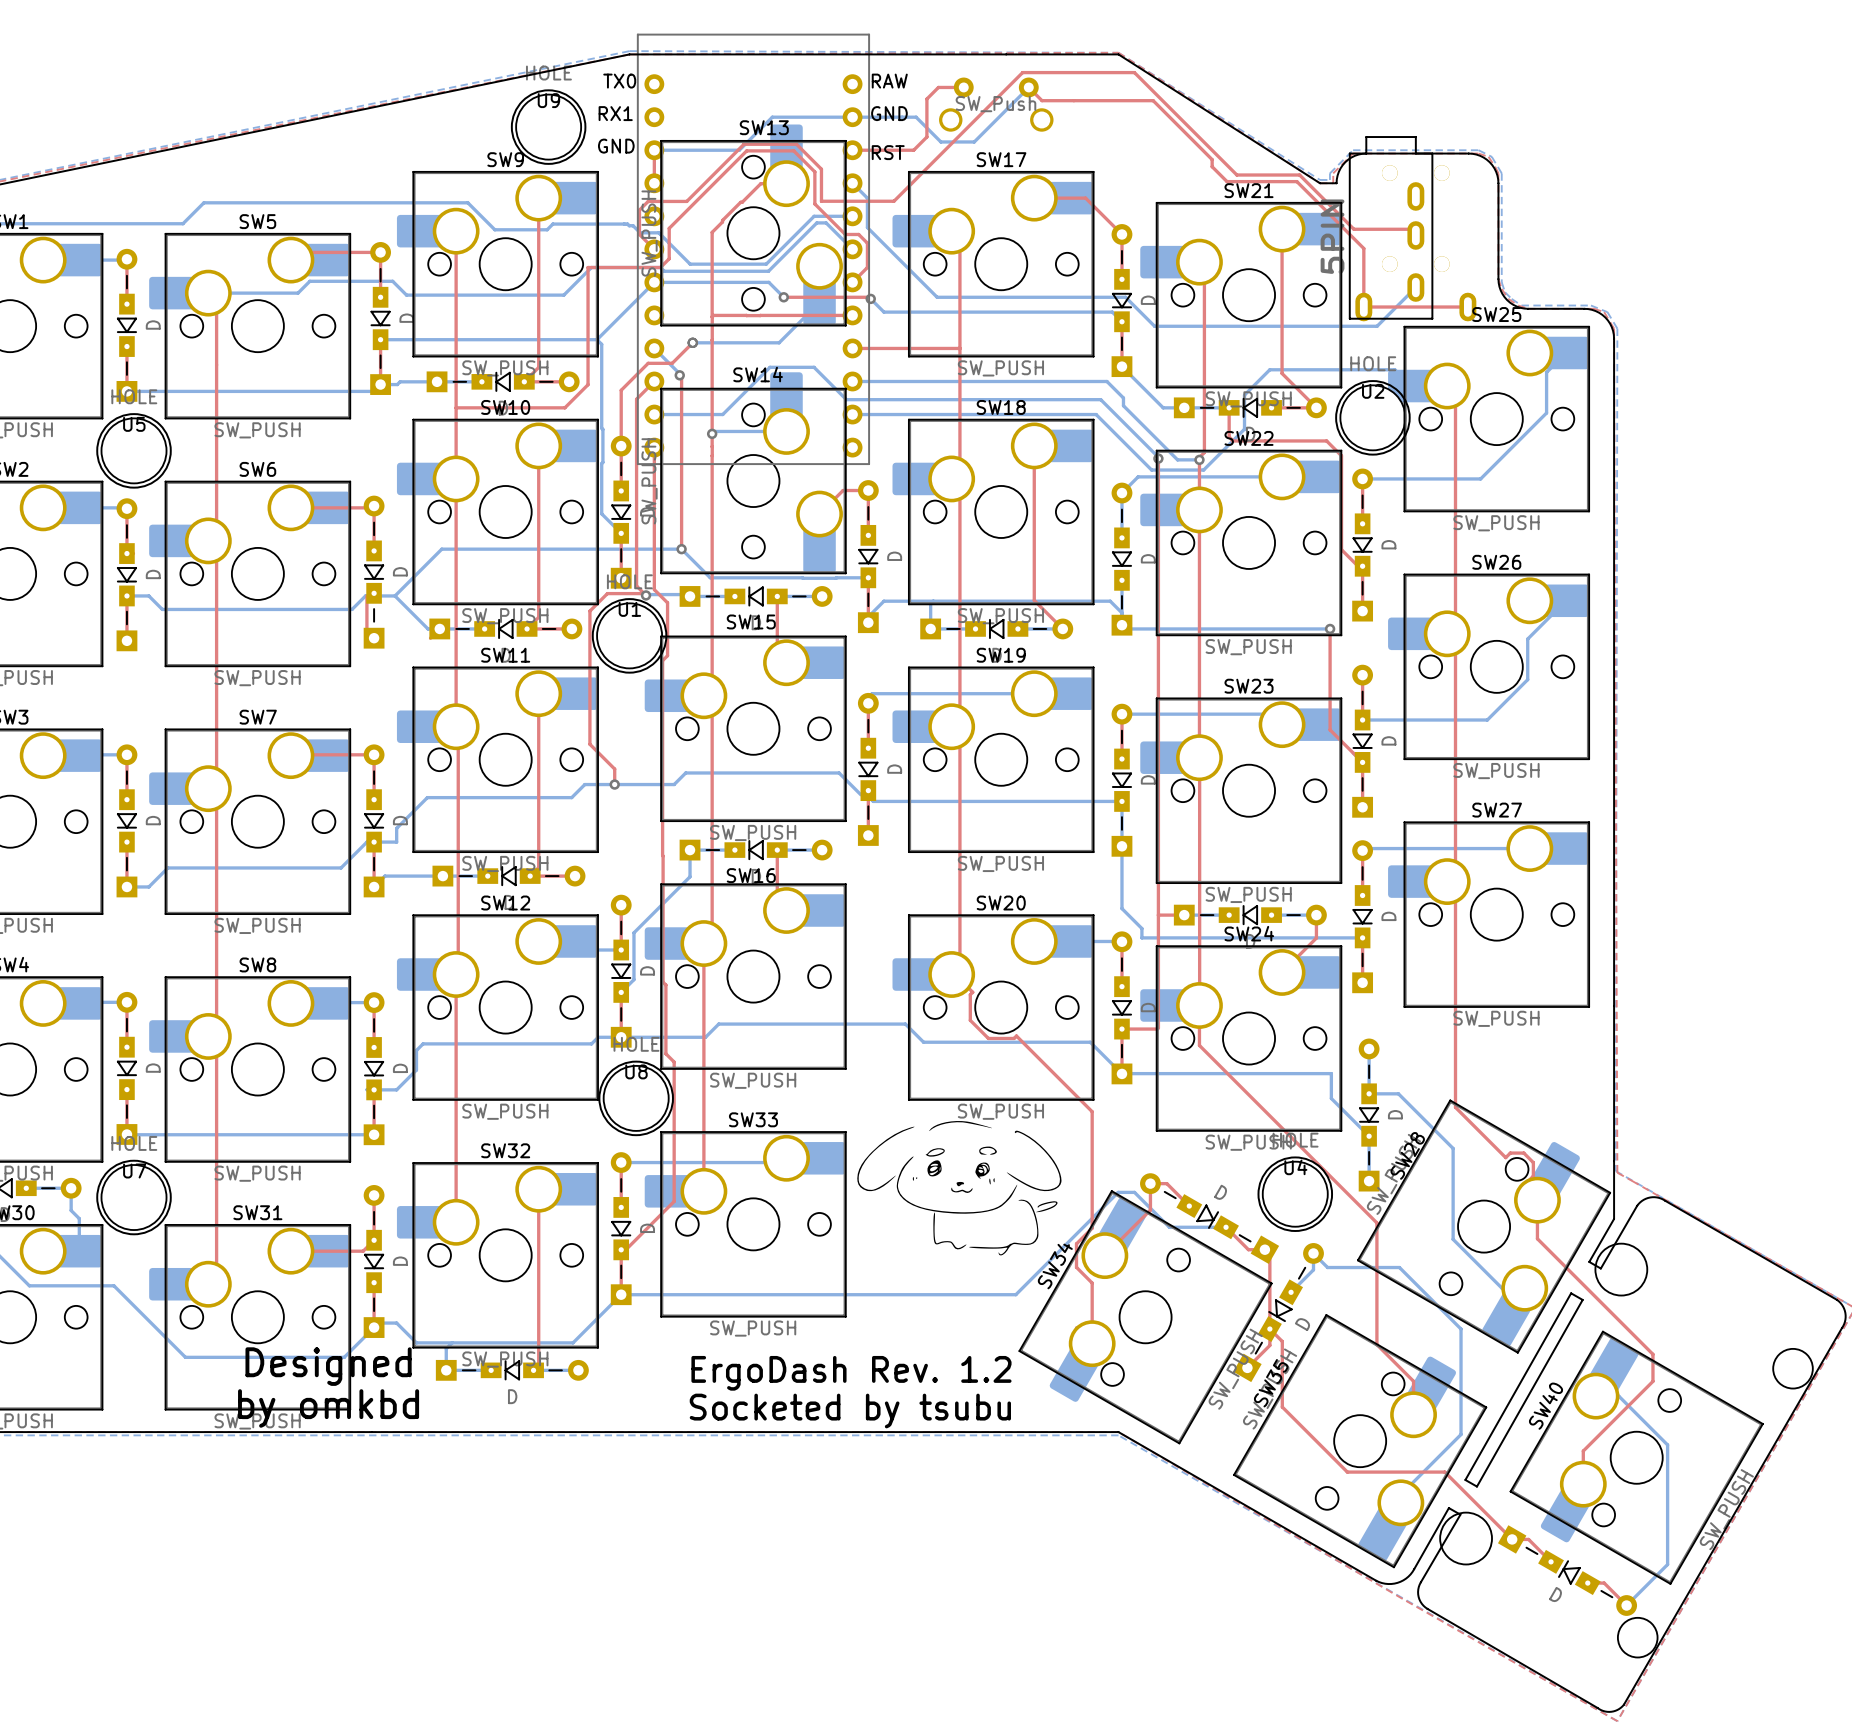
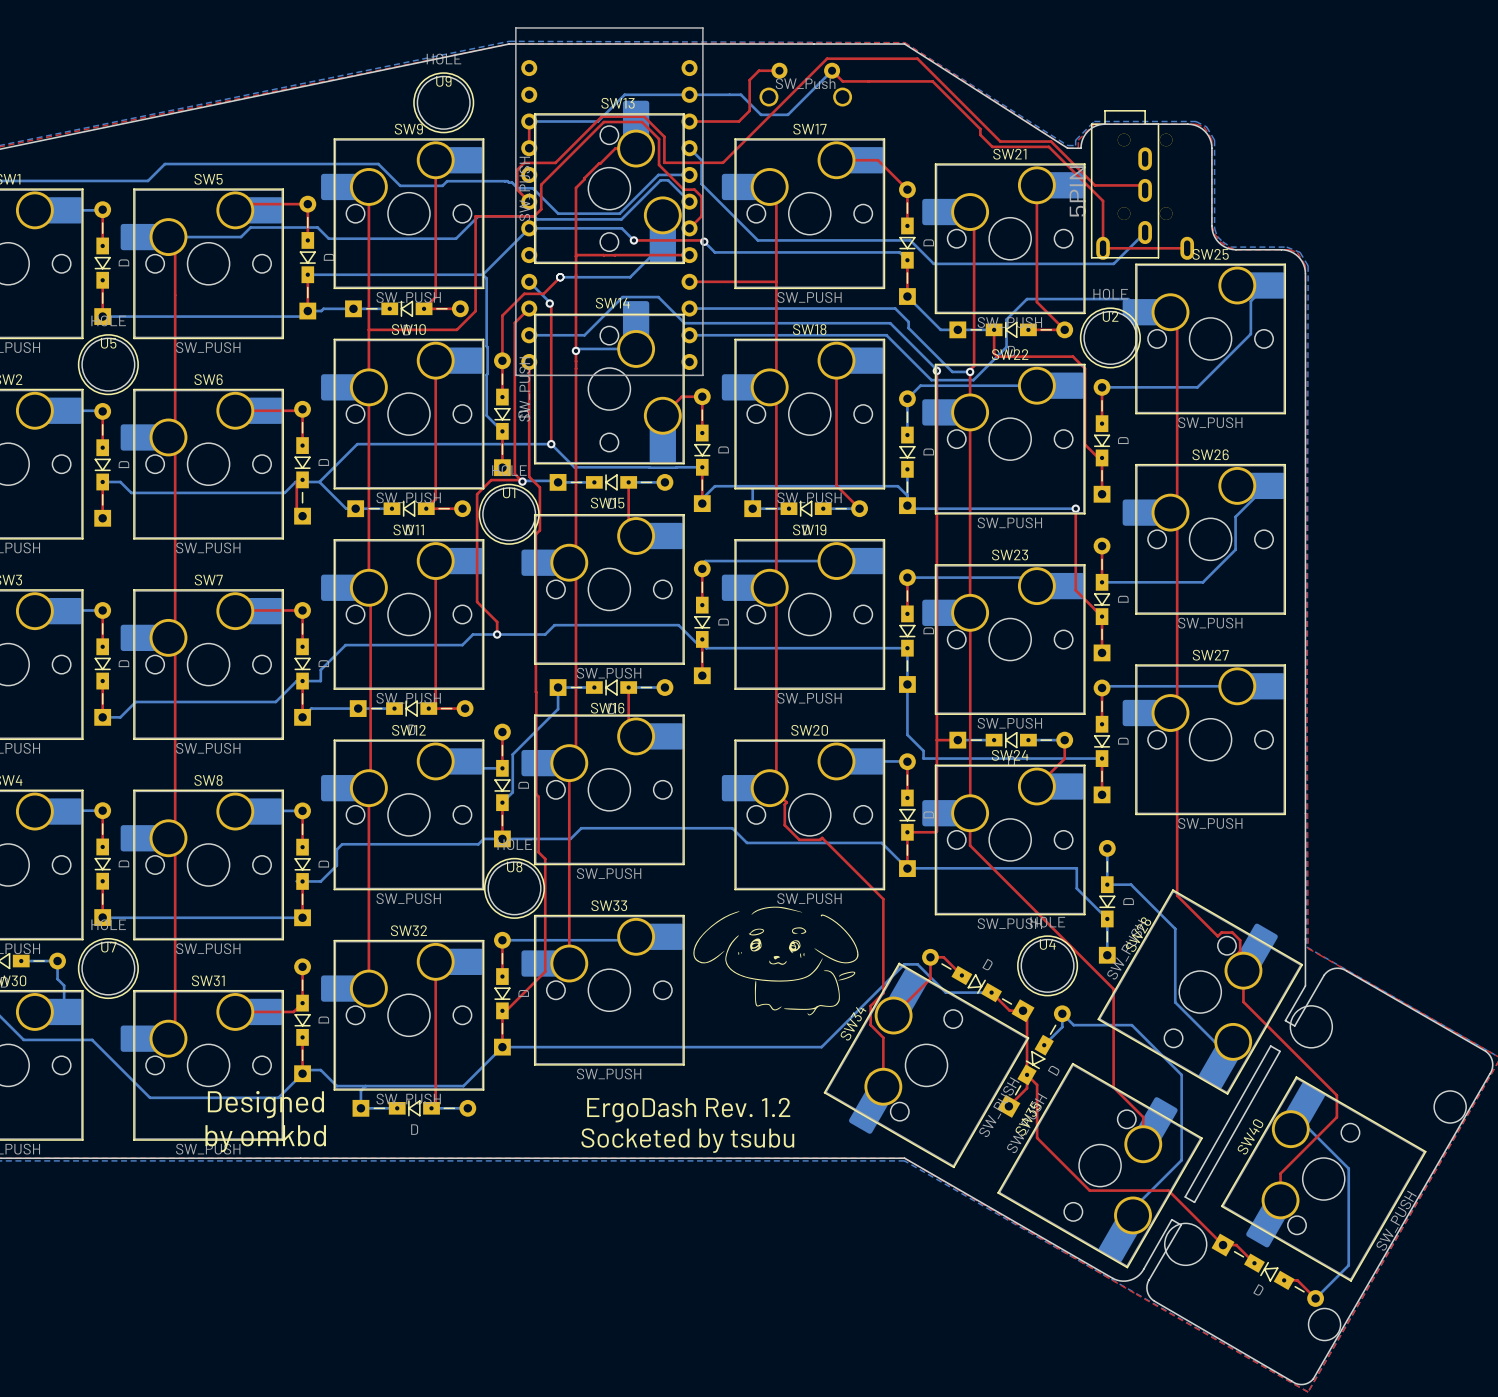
text: TX0 (619, 81) -> none
text: RAW (889, 81) -> none
text: RX1 (615, 113) -> none
text: GND (889, 113) -> none
text: GND (616, 146) -> none
text: RST (888, 152) -> none

